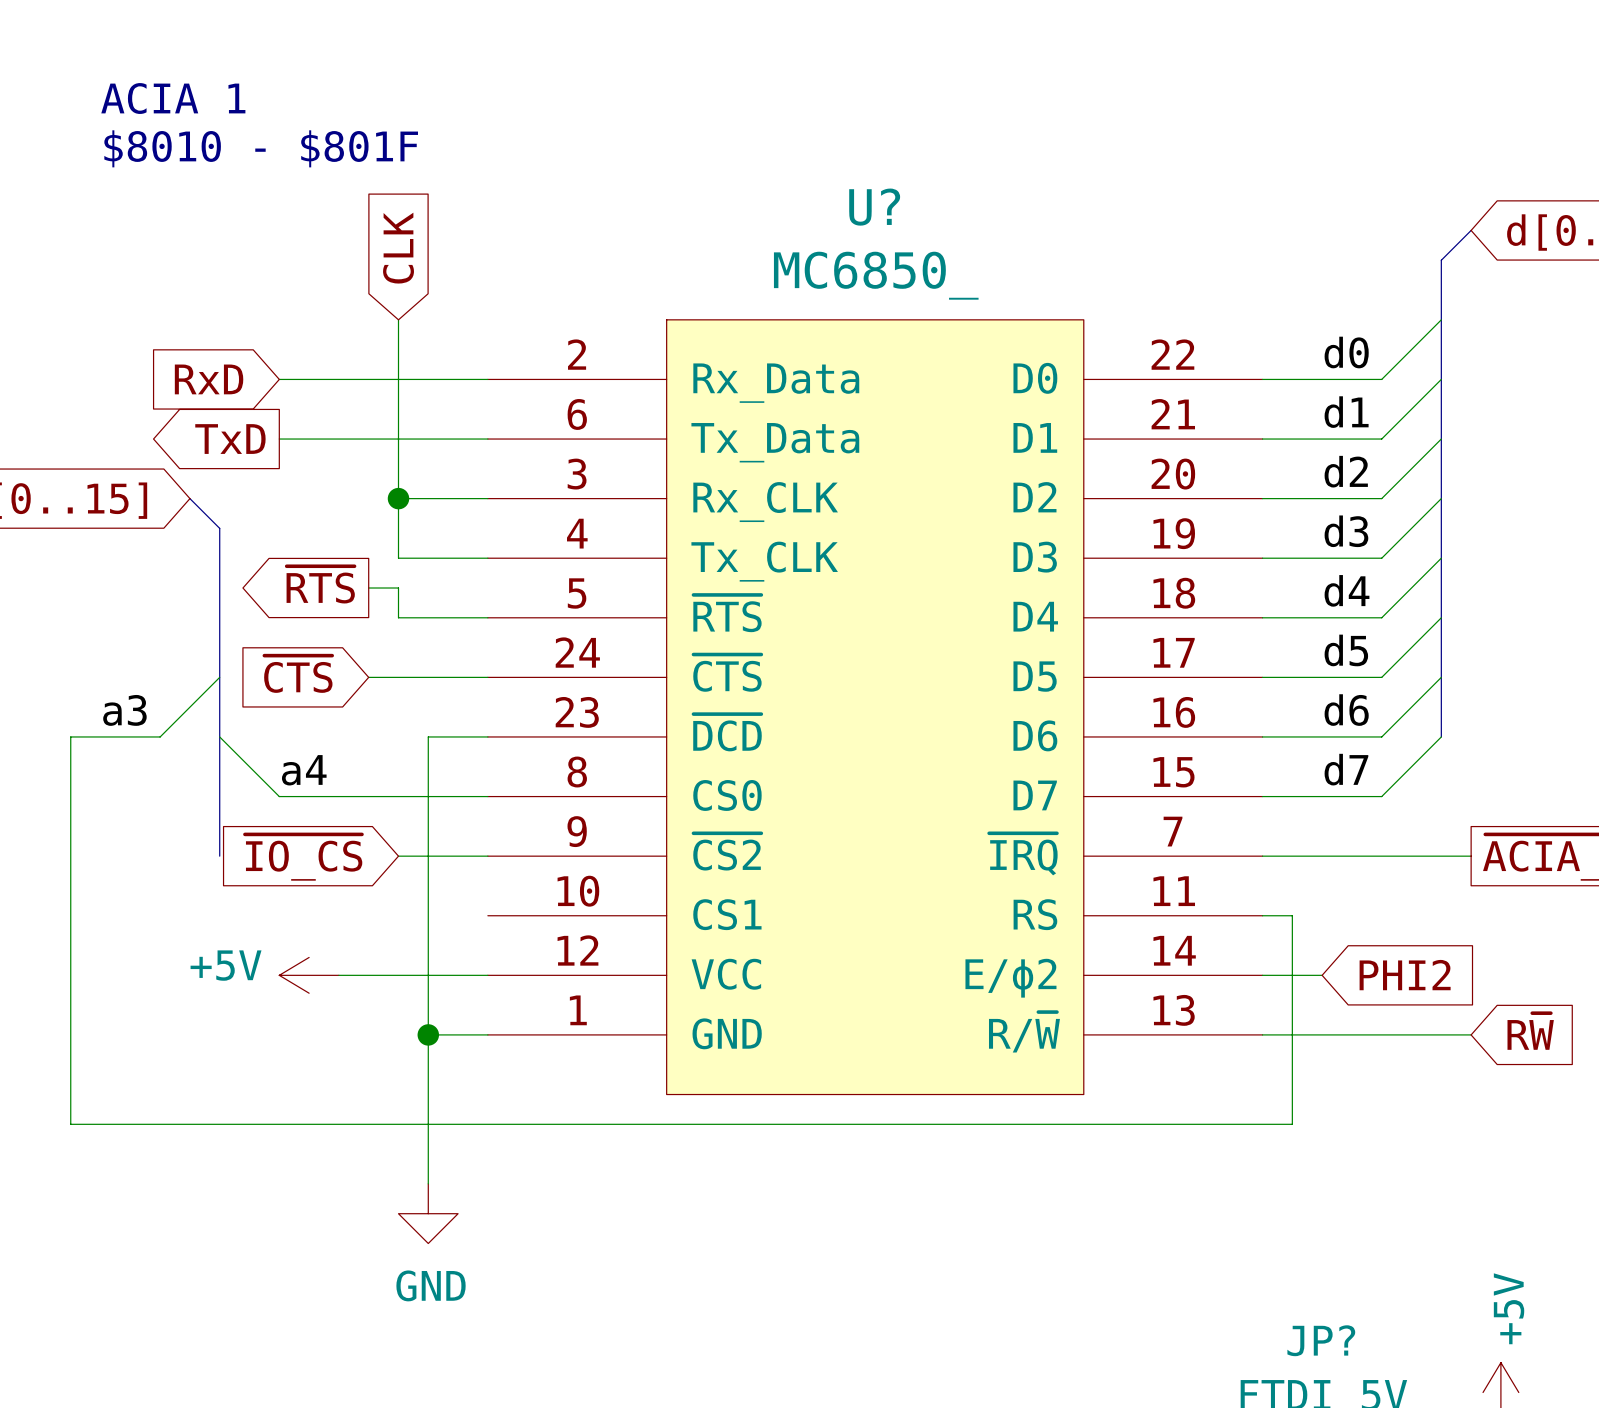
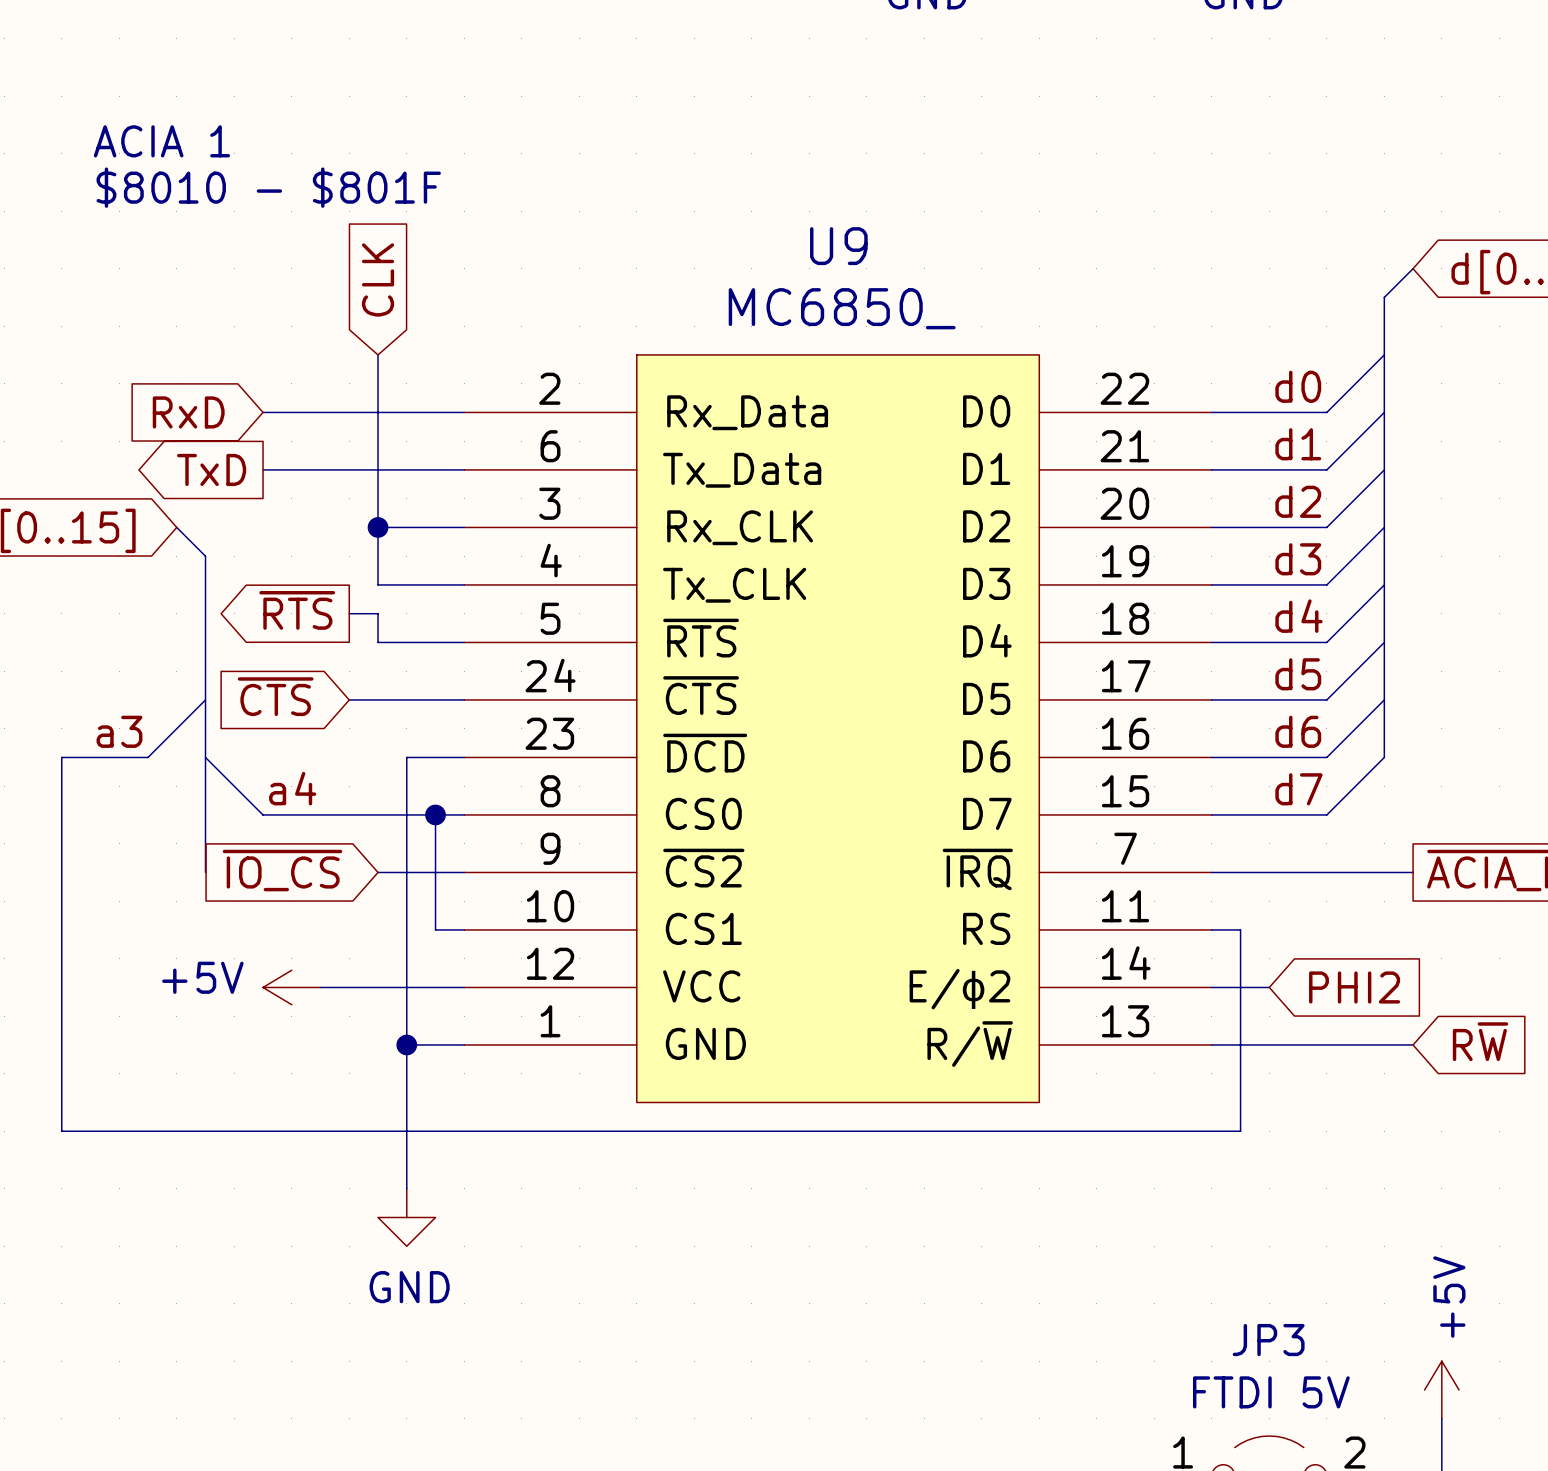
U? name: U? (874, 207) -> U9 (838, 246)
wire: none -> (435, 814) (435, 929) (464, 929)
junction: none -> (435, 814)
JP? name: JP? (1321, 1340) -> JP3 (1268, 1340)

